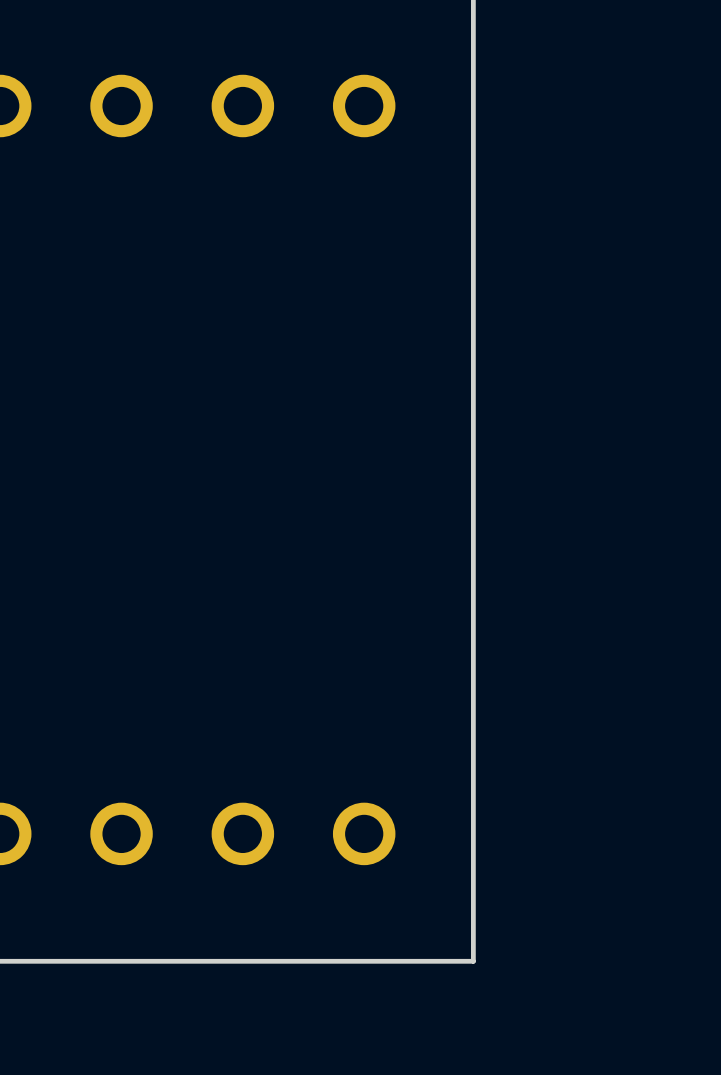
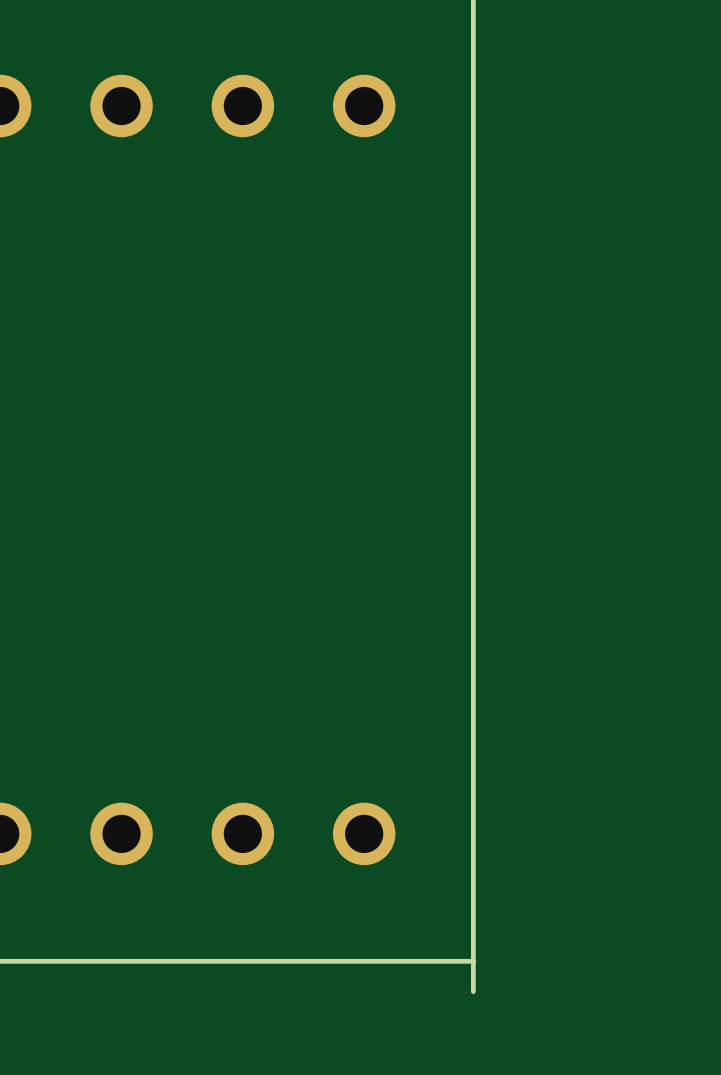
board edge: none -> (473, 961) (473, 991)

